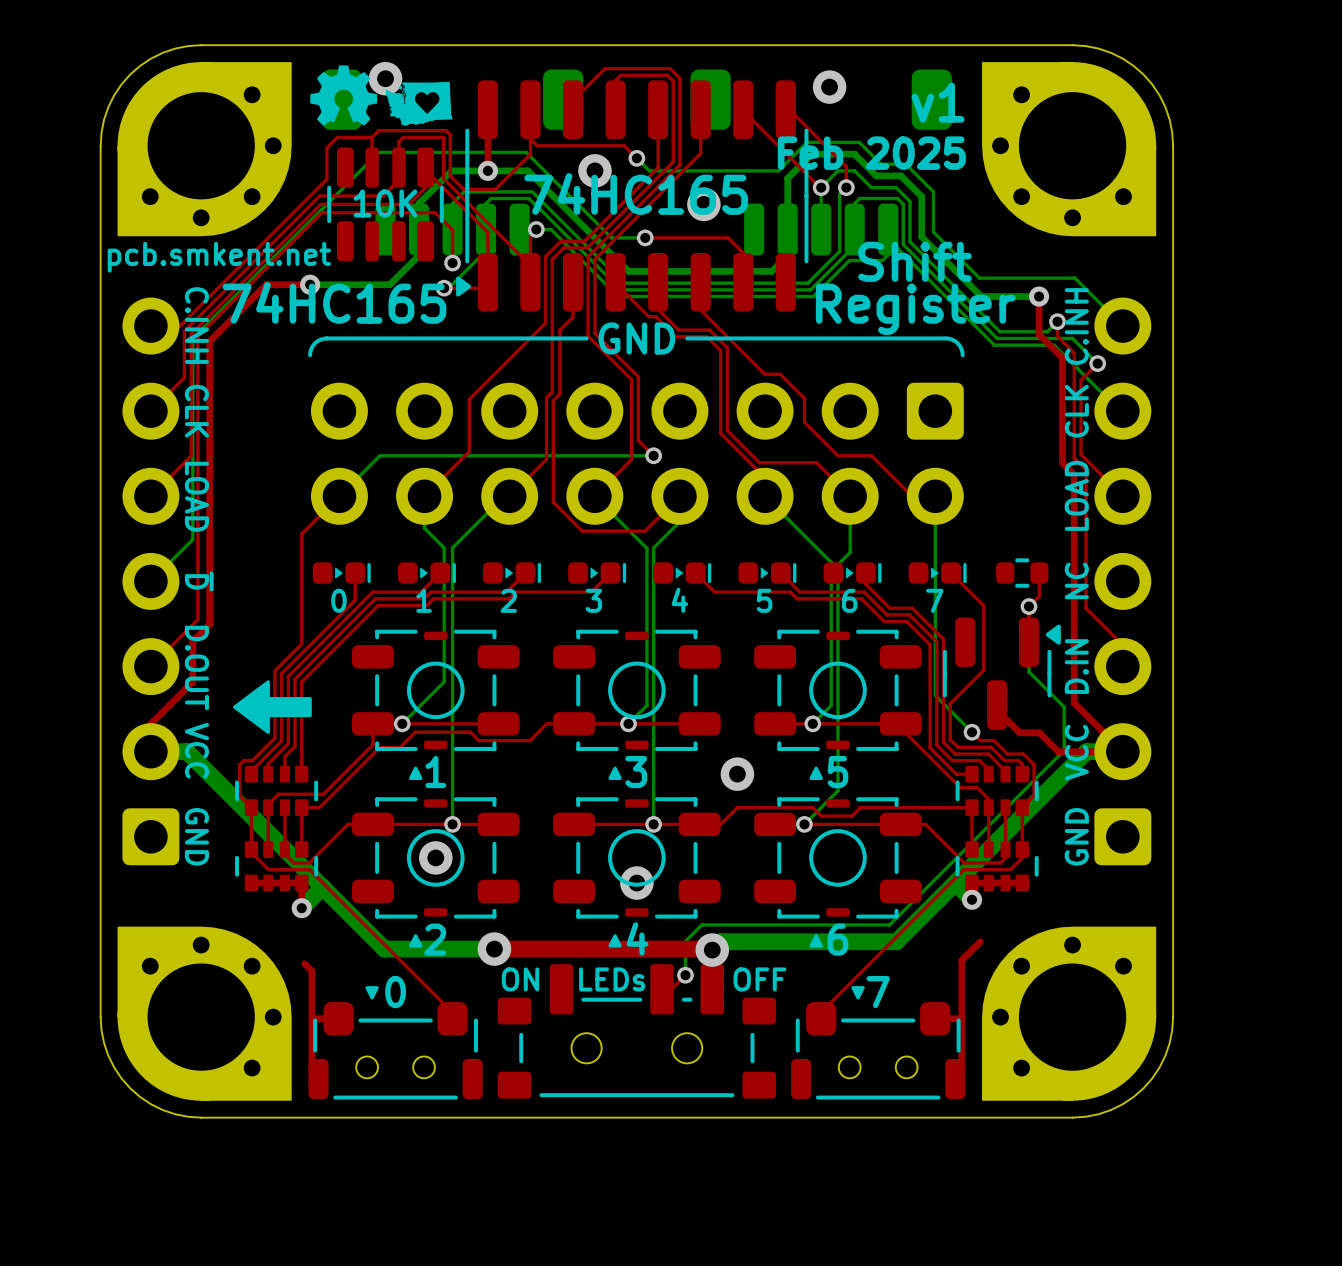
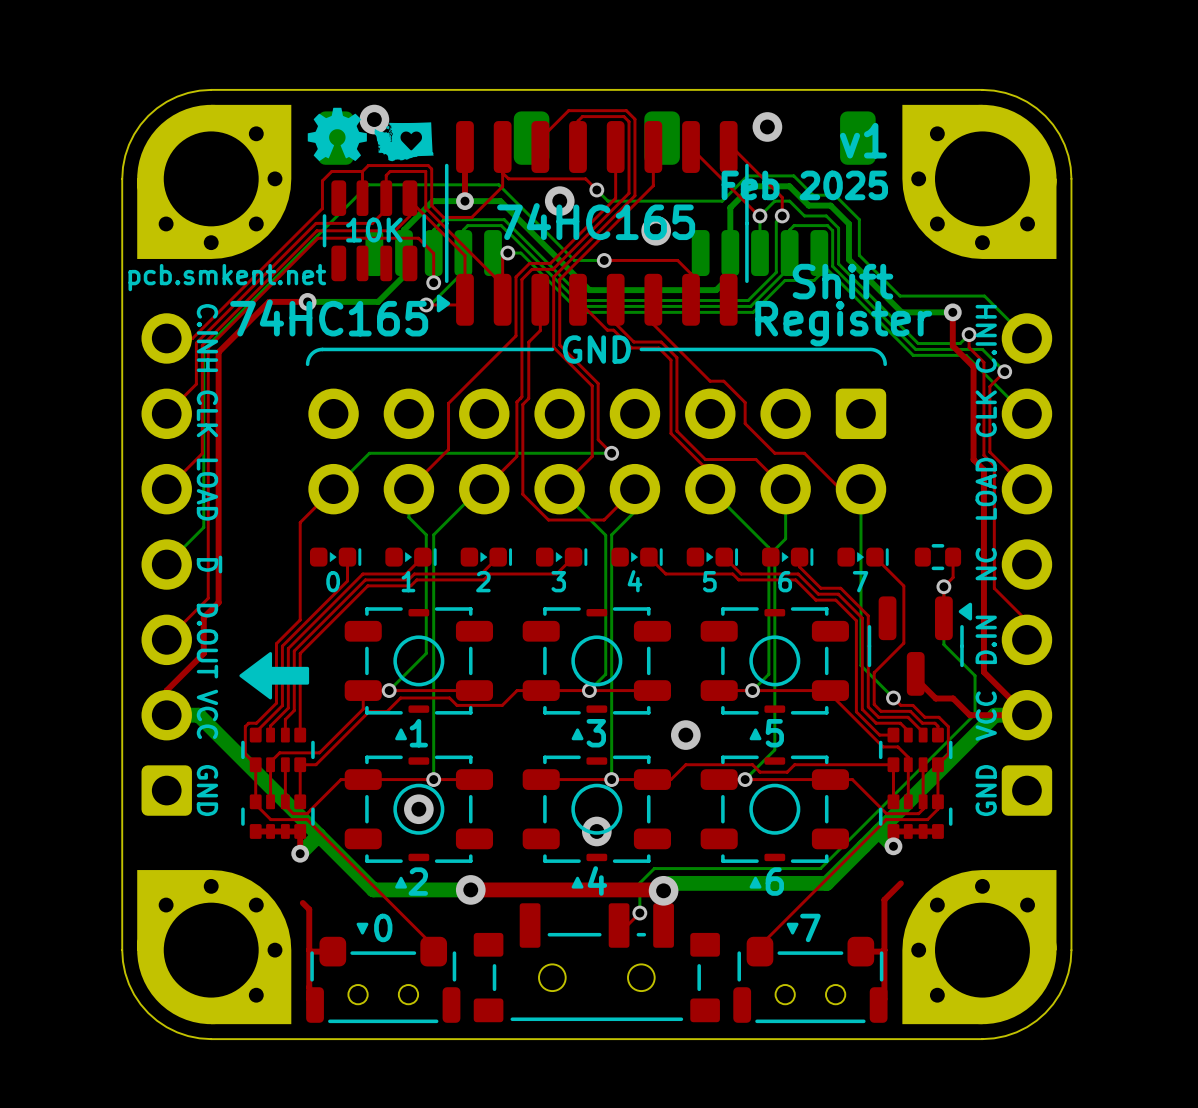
text: ON (520, 979) -> none
text: LEDs (612, 979) -> none
text: OFF (759, 979) -> none

